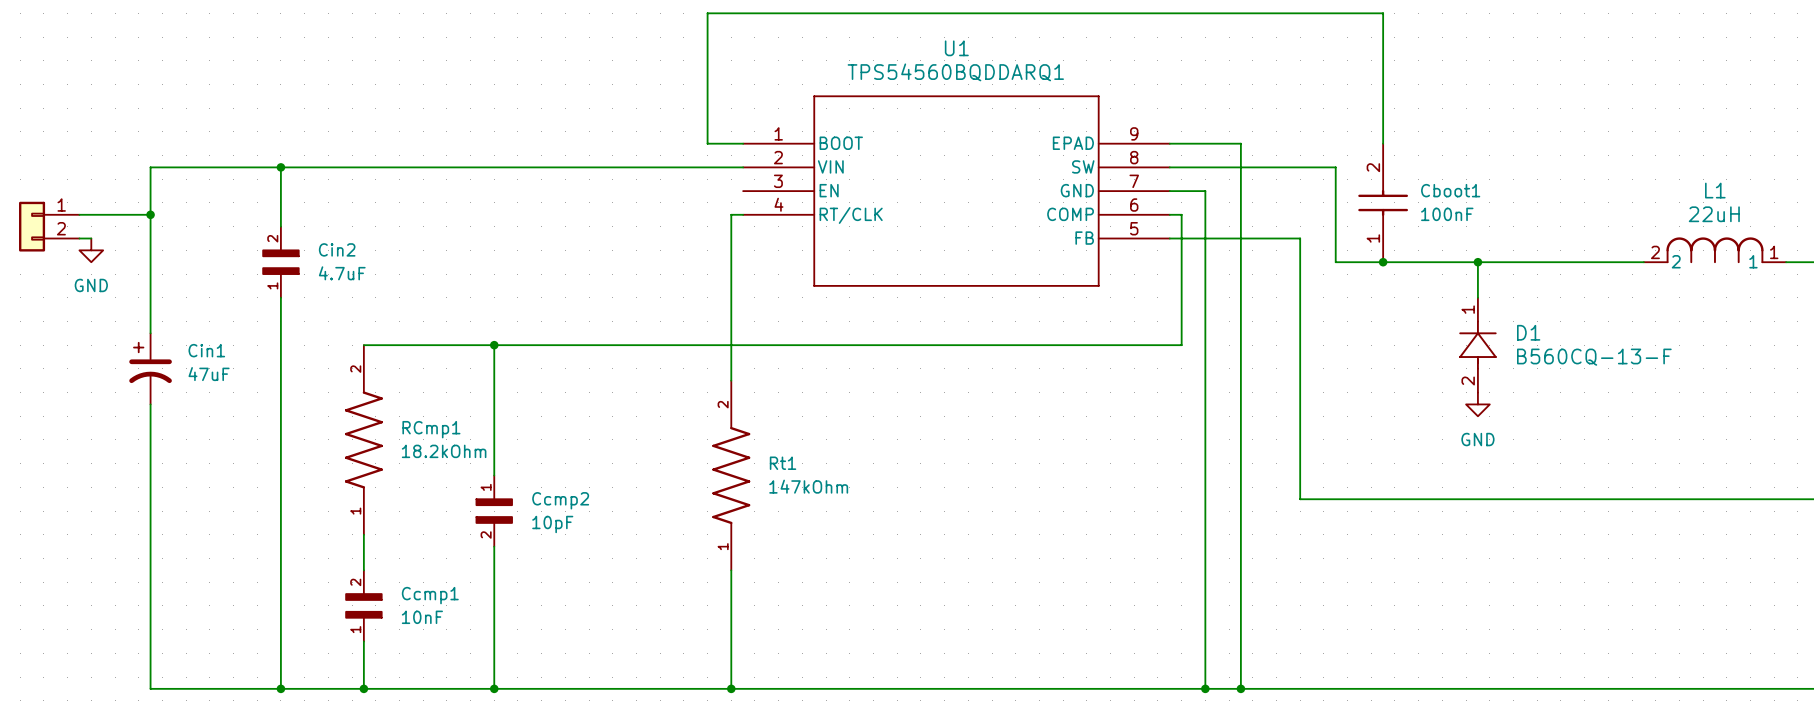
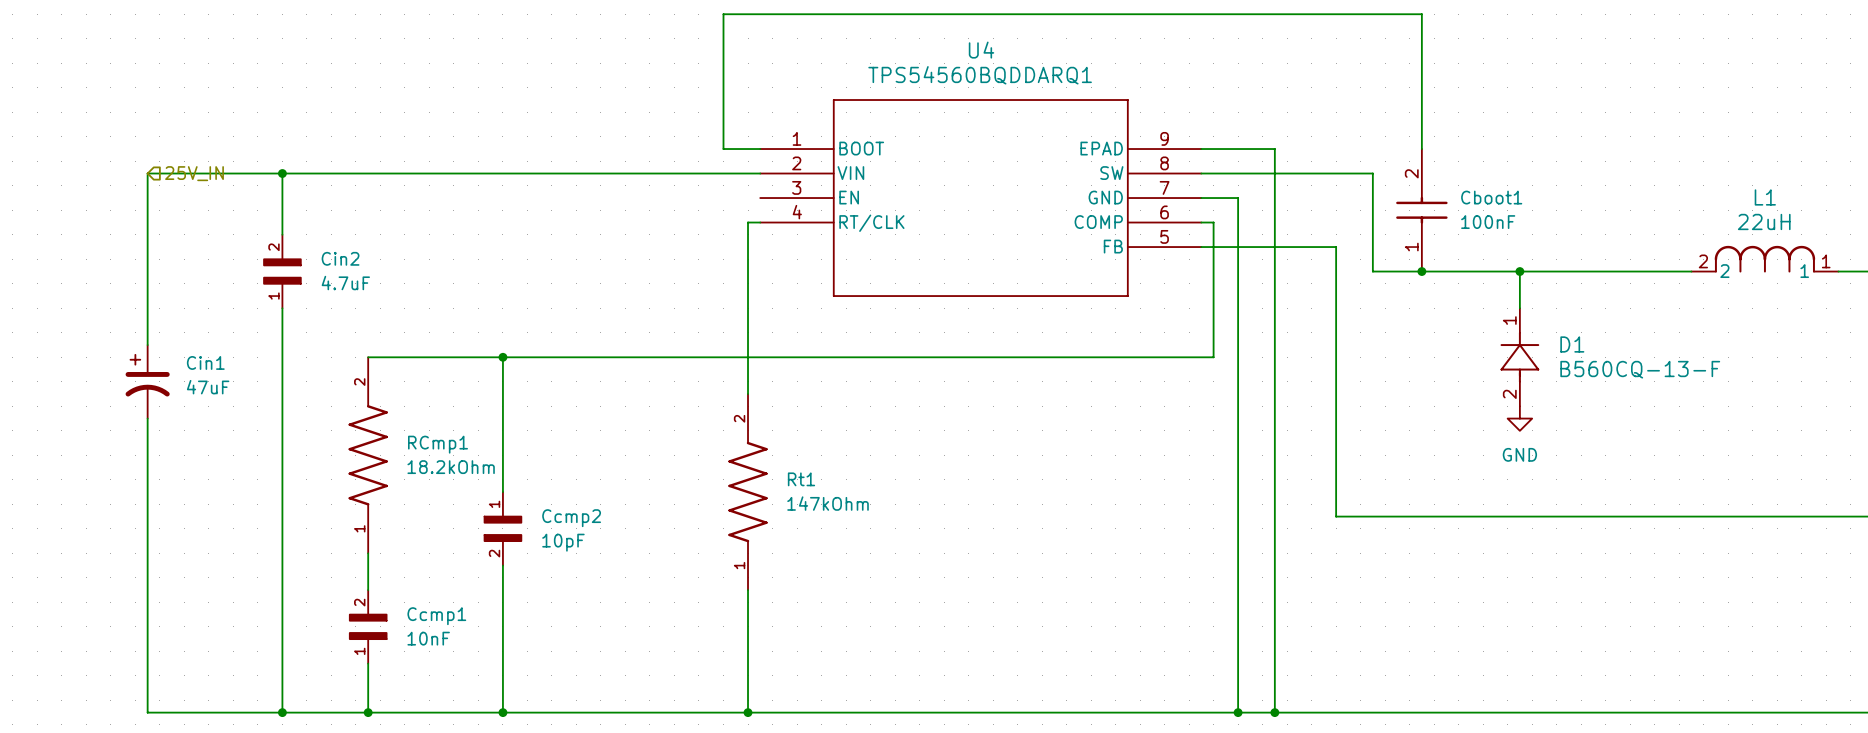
U1 name: U1 (956, 48) -> U4 (981, 50)
hierarchical label: none -> 25V_IN (194, 173)
wire: (79, 214) (150, 214) -> none
junction: (150, 214) -> none
part: (49, 226) -> none
wire: (79, 238) (91, 238) -> none
power symbol: GND (91, 250) -> none

